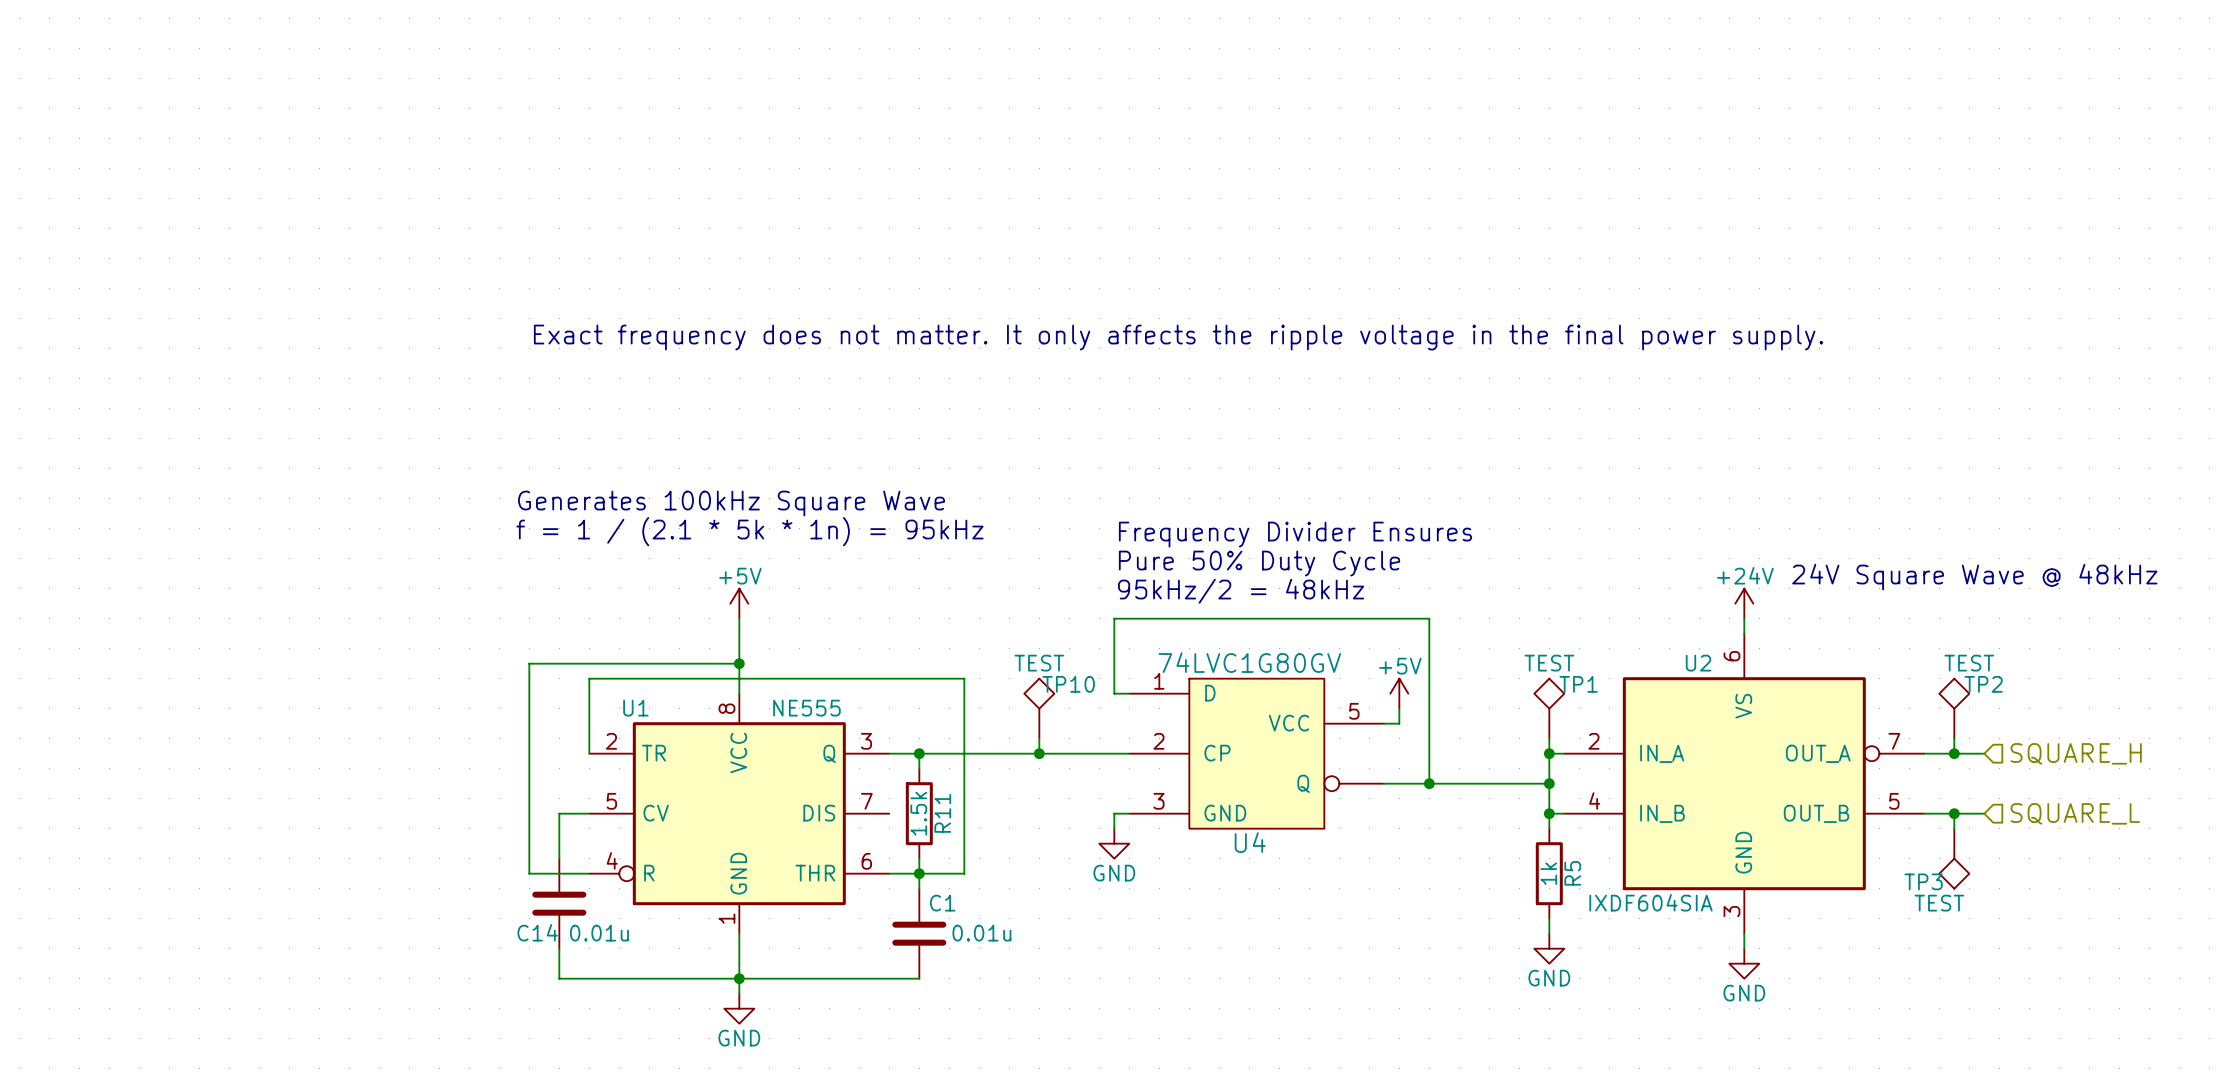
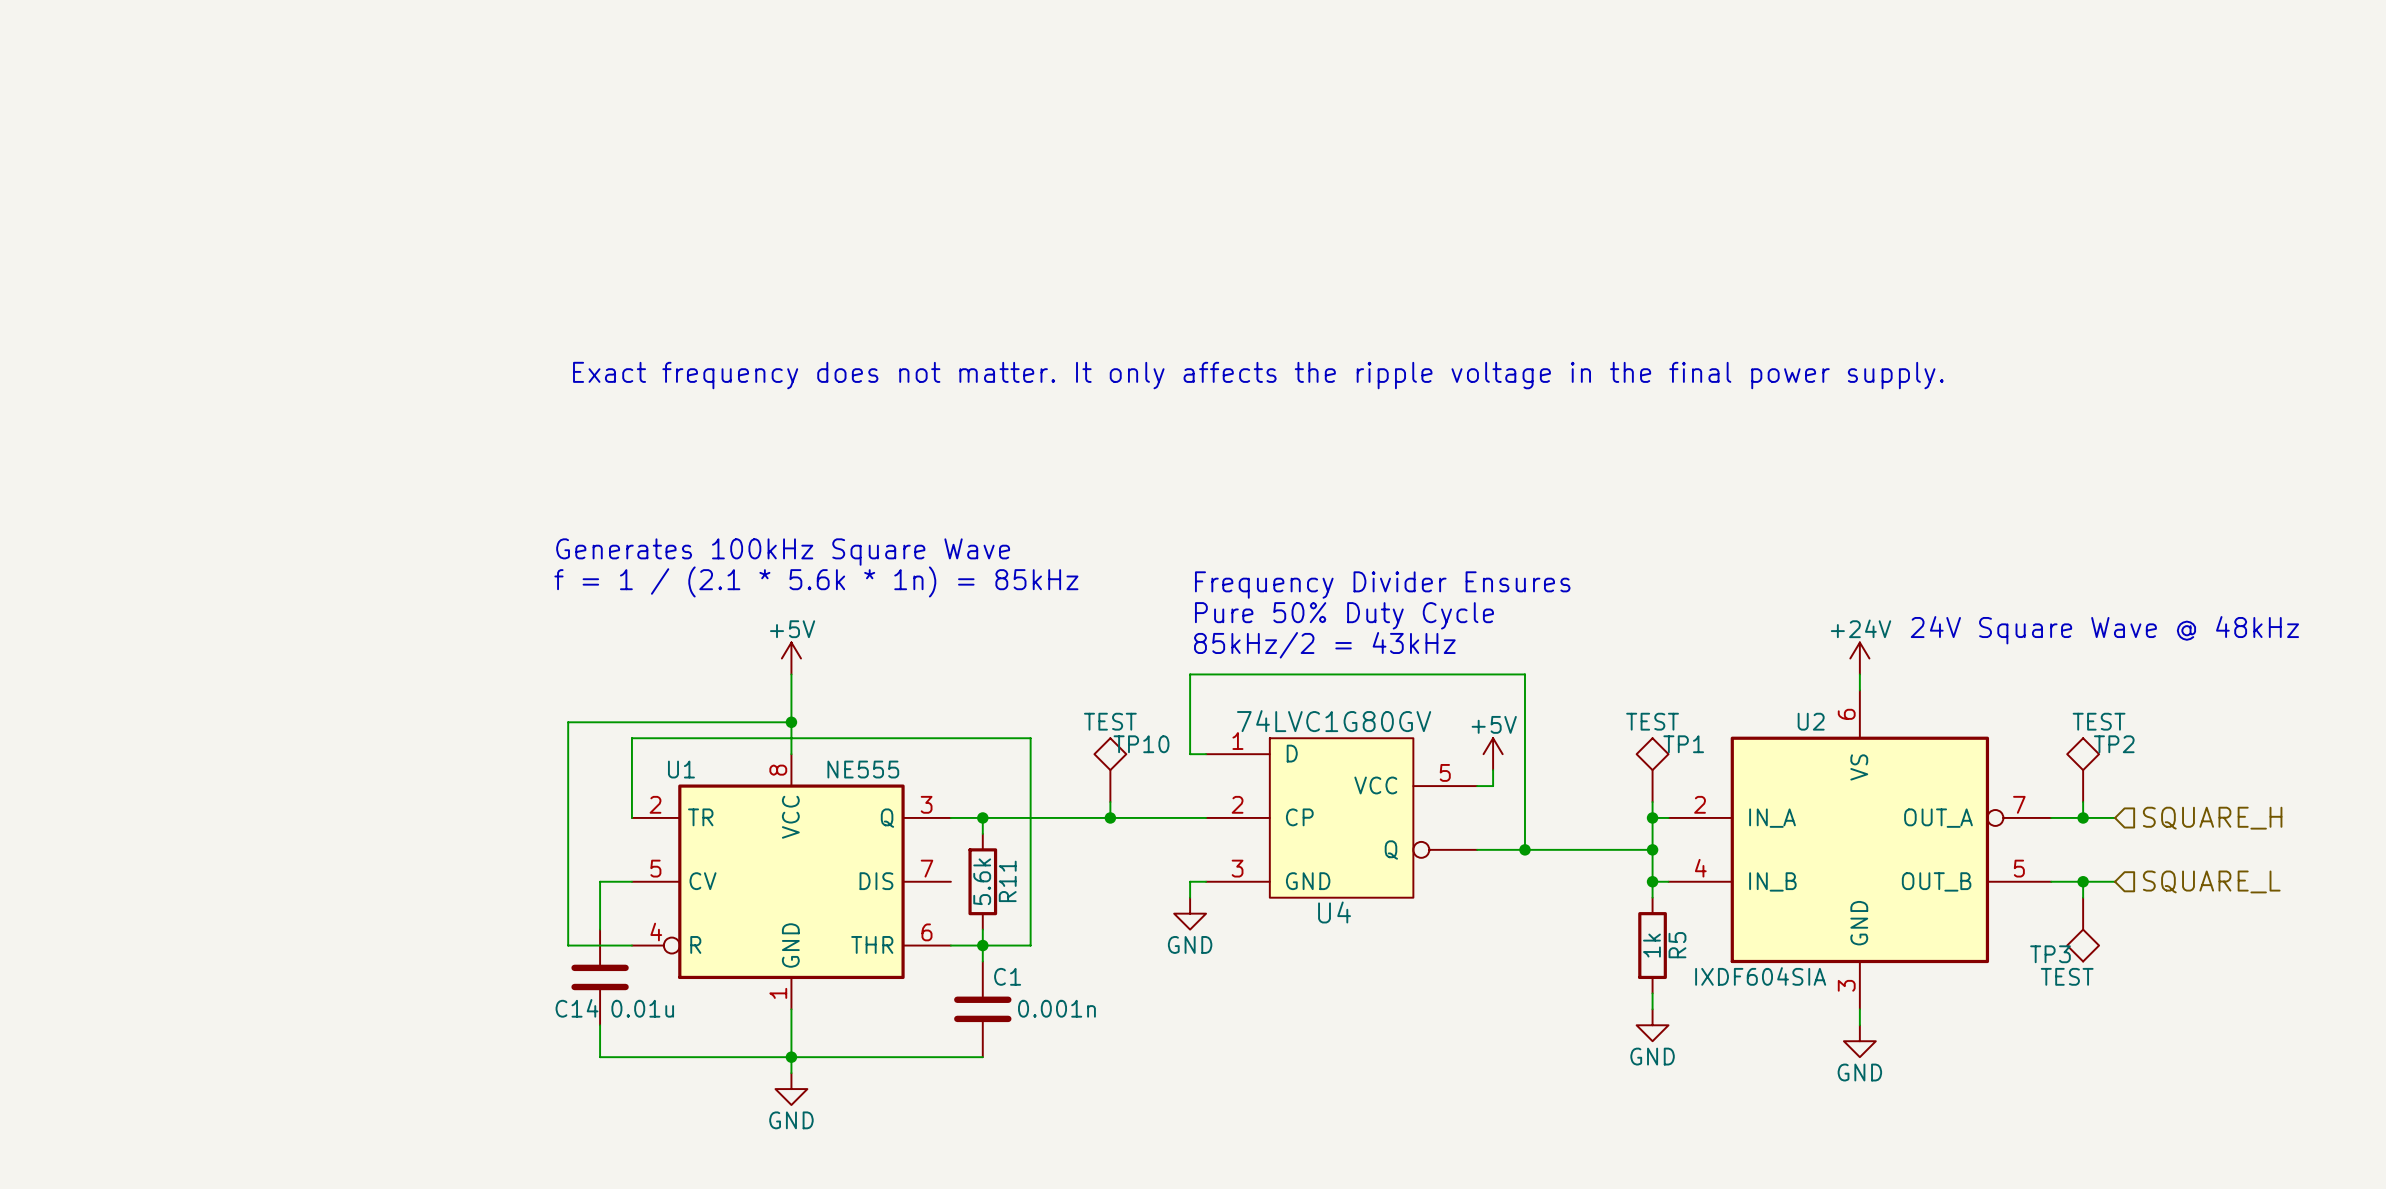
text: f = 1 / (2.1 * 5k * 1n) = 95kHz (749, 531) -> f = 1 / (2.1 * 5.6k * 1n) = 85kHz (816, 581)
text: 95kHz/2 = 48kHz (1241, 591) -> 85kHz/2 = 43kHz (1324, 645)
R11 value: 1.5k (918, 813) -> 5.6k (982, 881)
C1 value: 0.01u (981, 933) -> 0.001n (1056, 1008)

